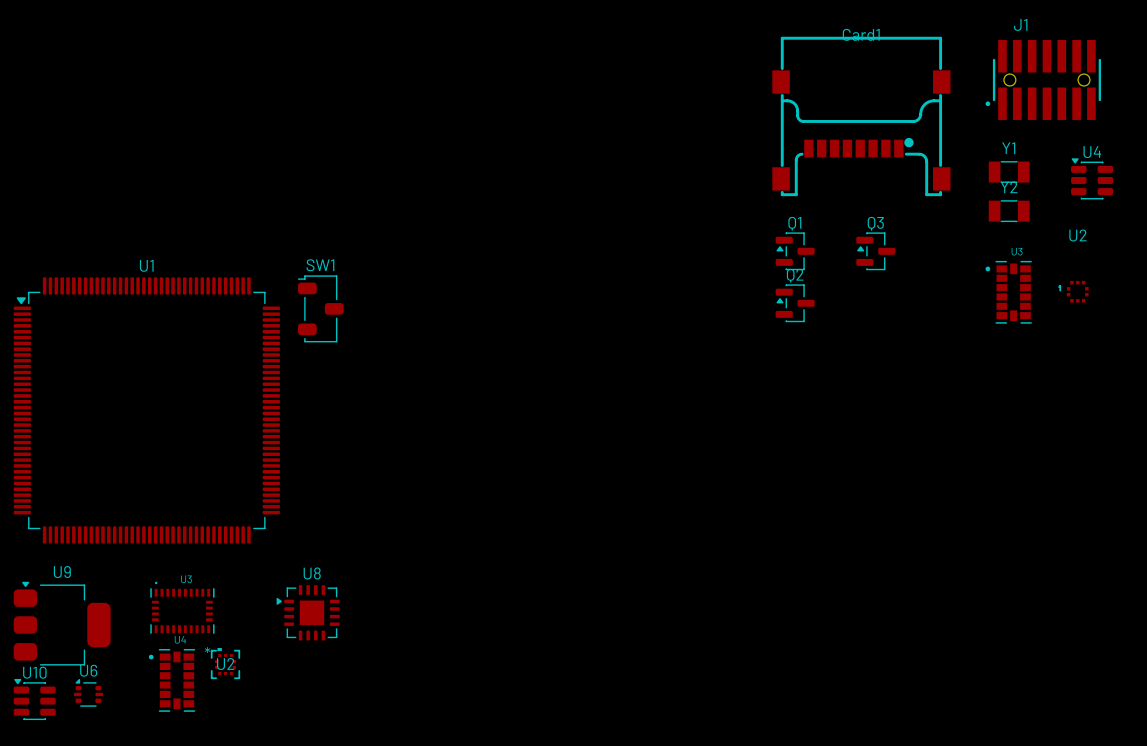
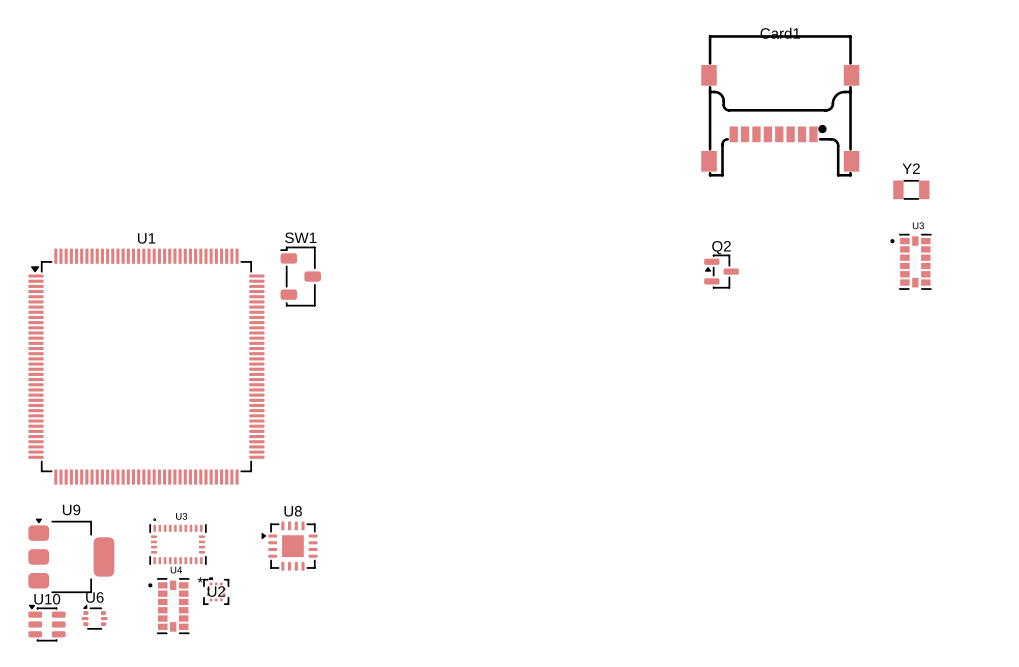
J1: (1043, 80) -> none
Y1: (1009, 172) -> none
U4: (1092, 178) -> none
Q1: (795, 251) -> none
Q3: (875, 251) -> none
U2: (1073, 291) -> none

